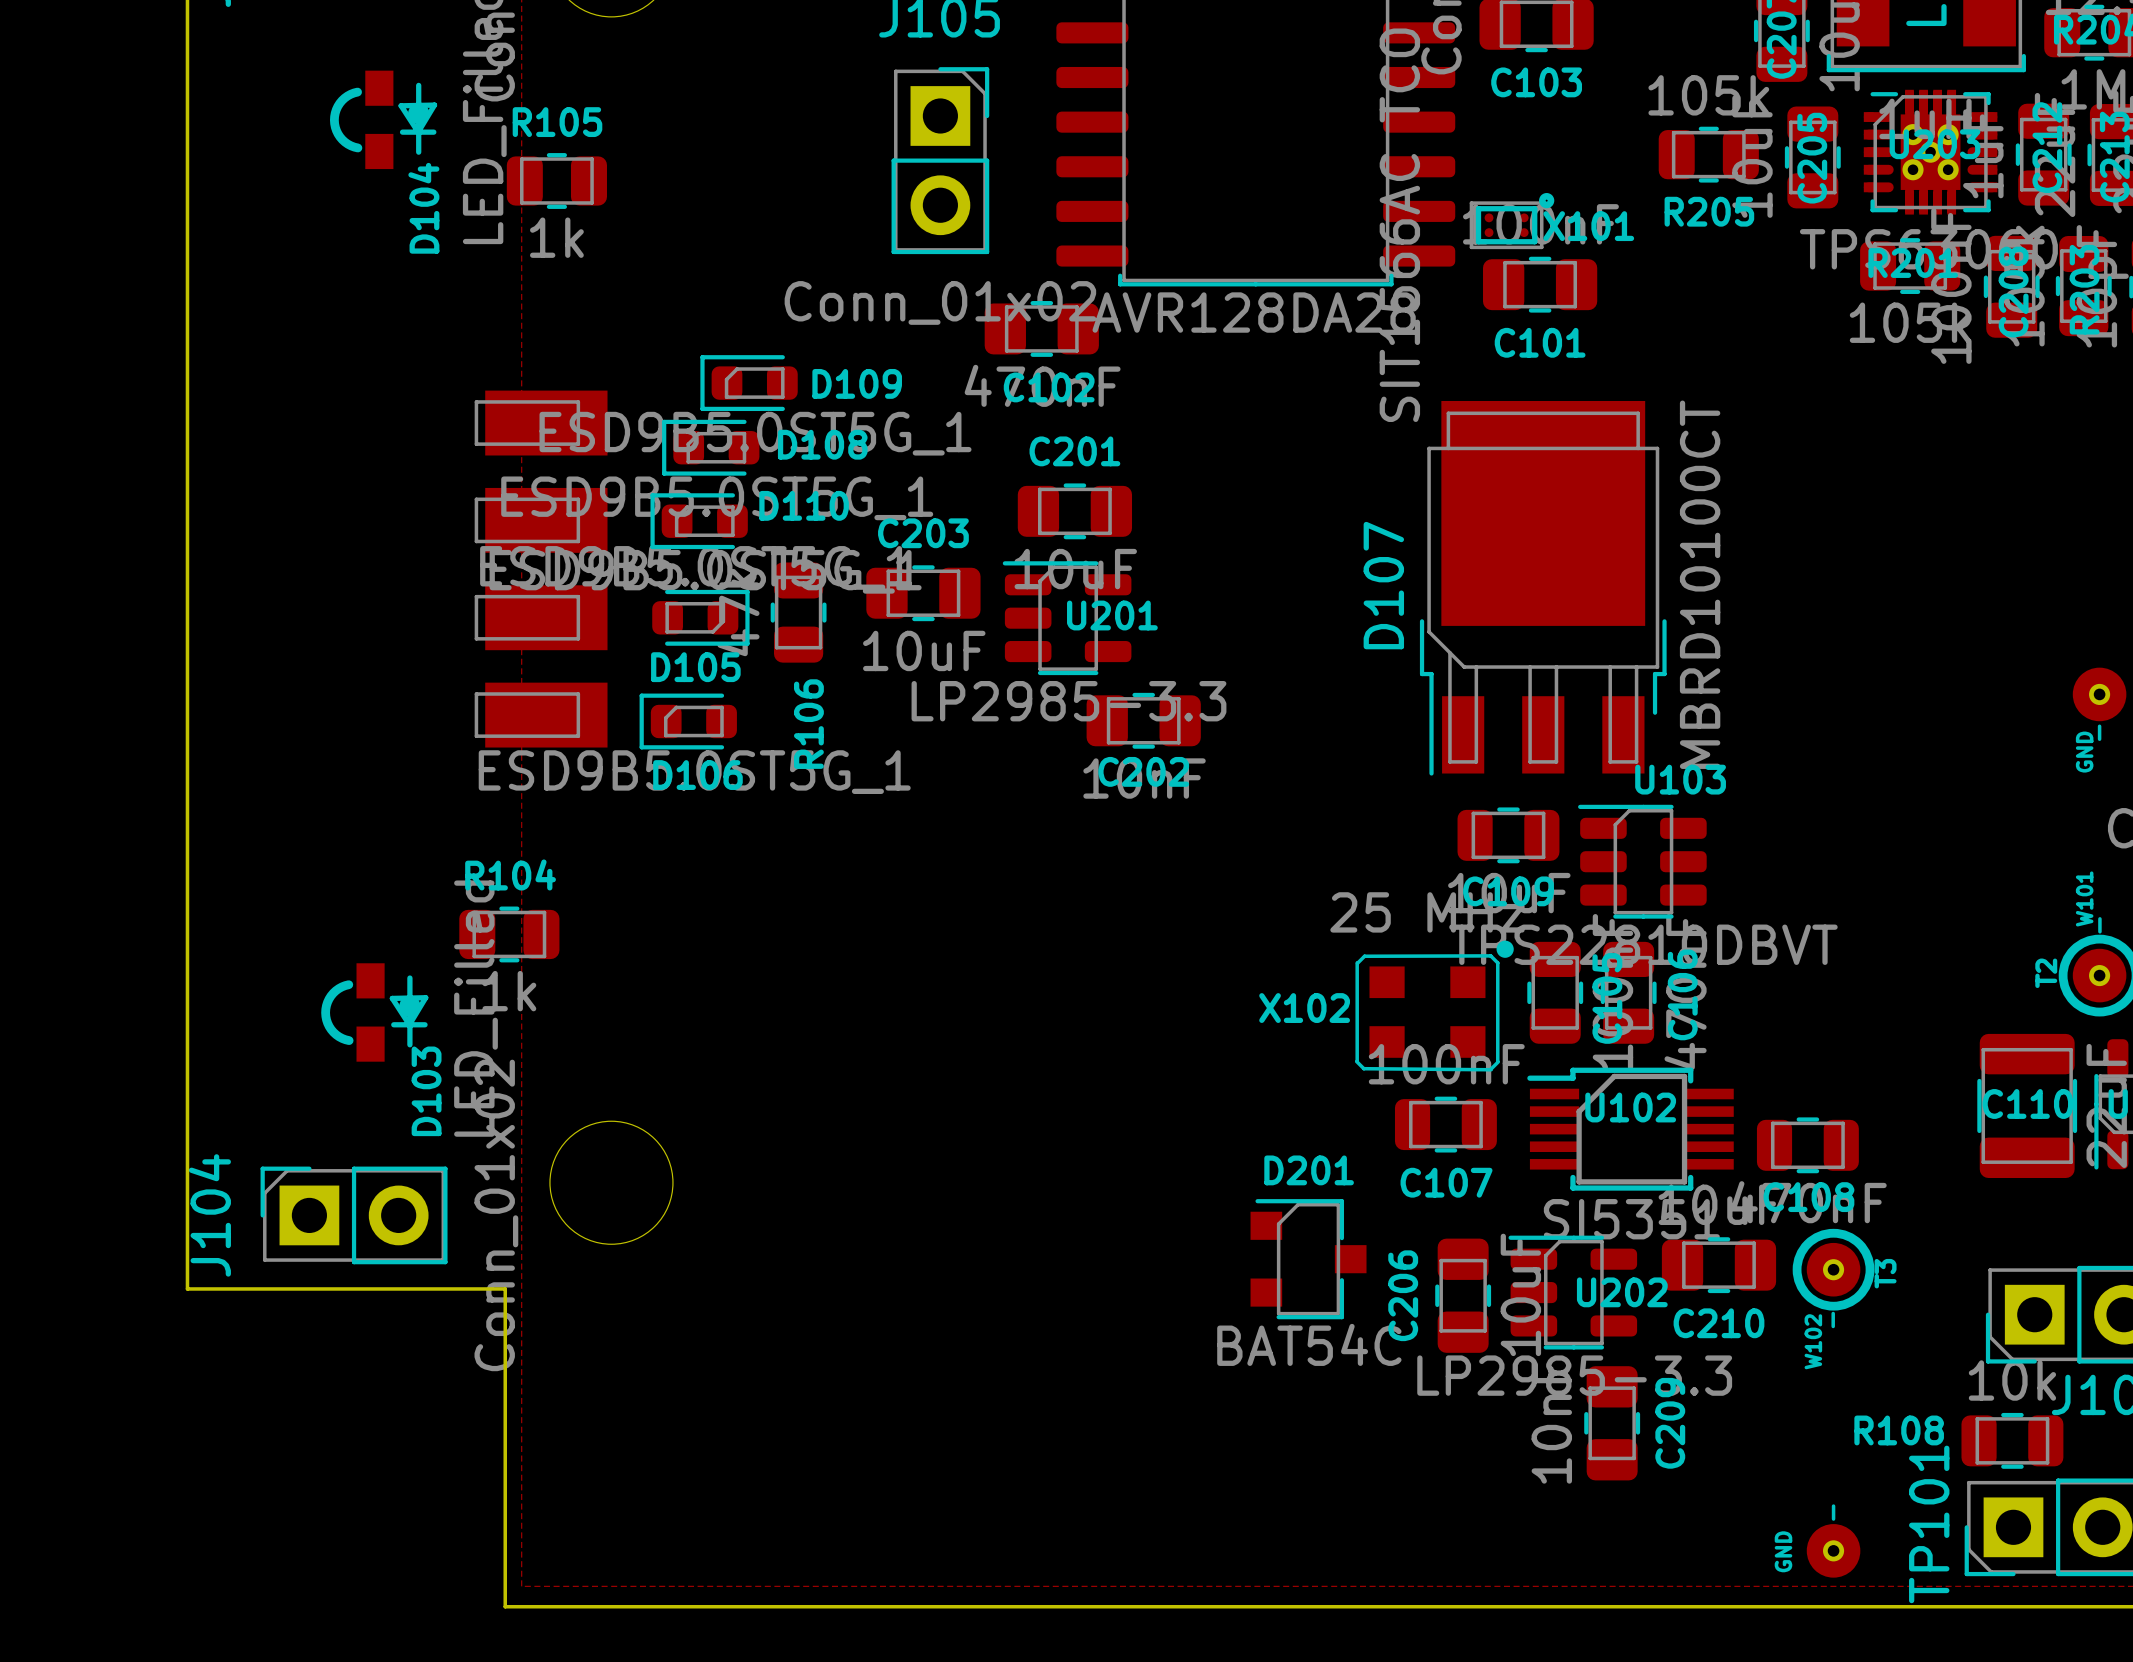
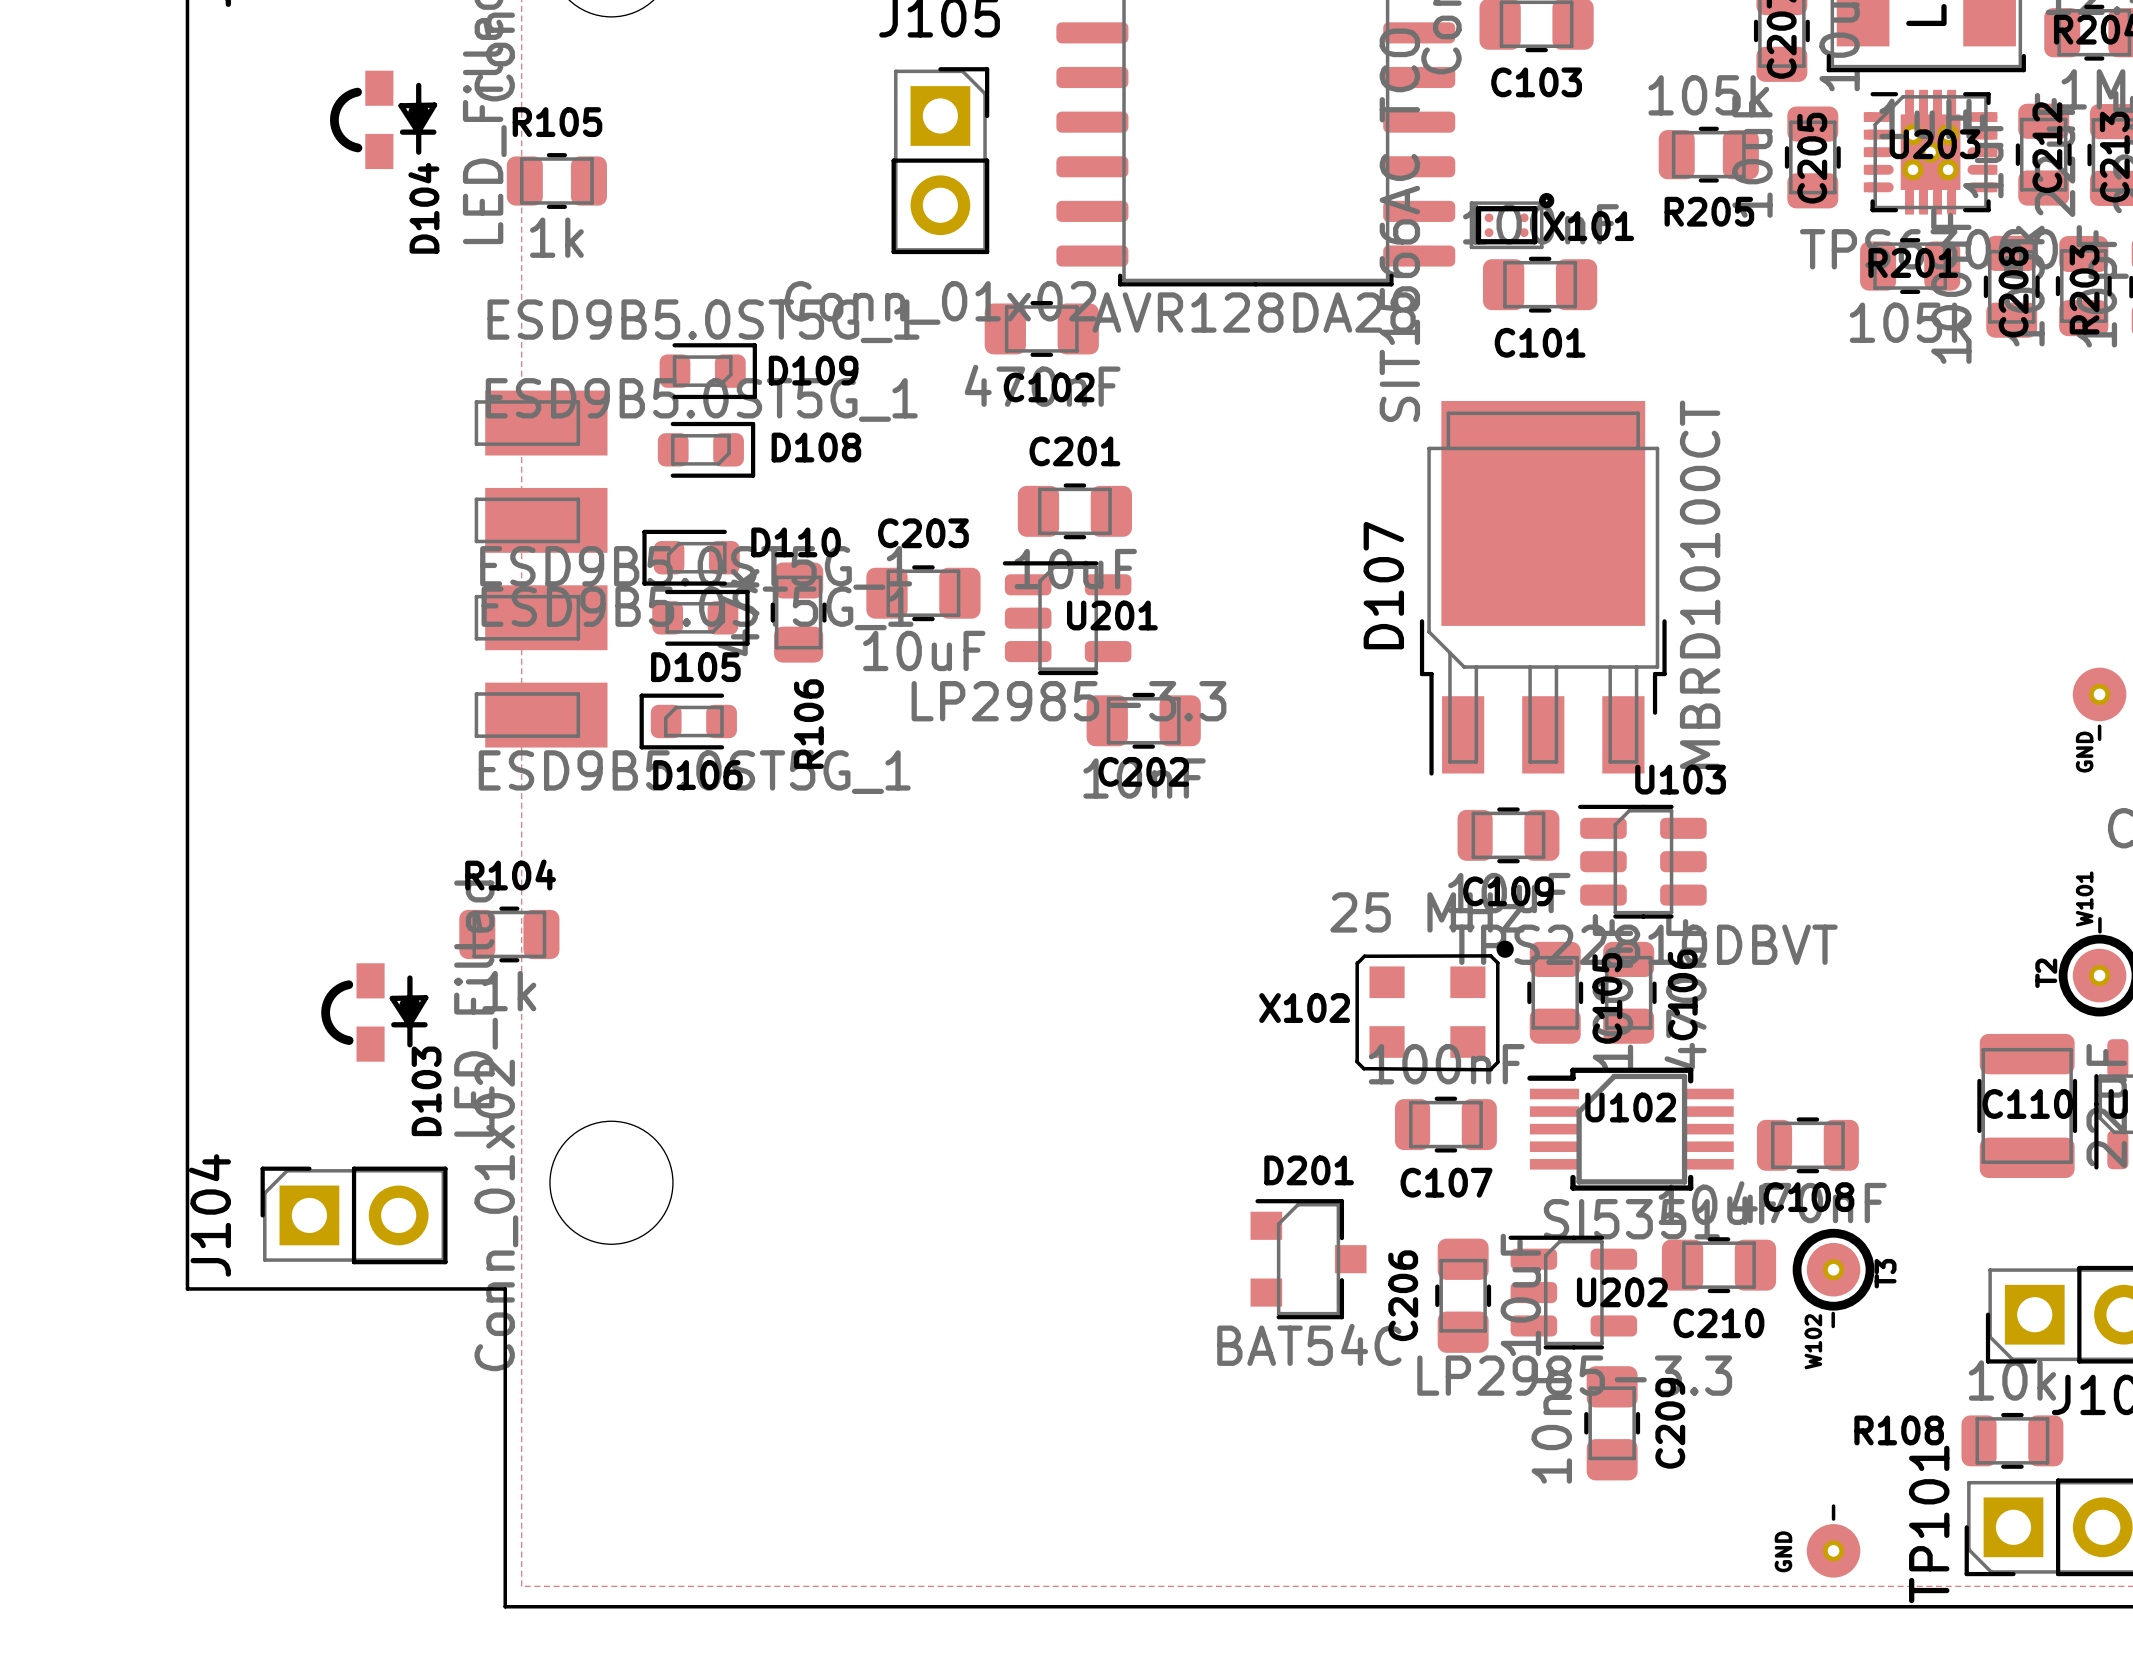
D109 rotation: 0° (749, 383) -> 180° (708, 371)
D108 rotation: 0° (710, 447) -> 180° (706, 449)
D110 position: (699, 521) -> (691, 557)

